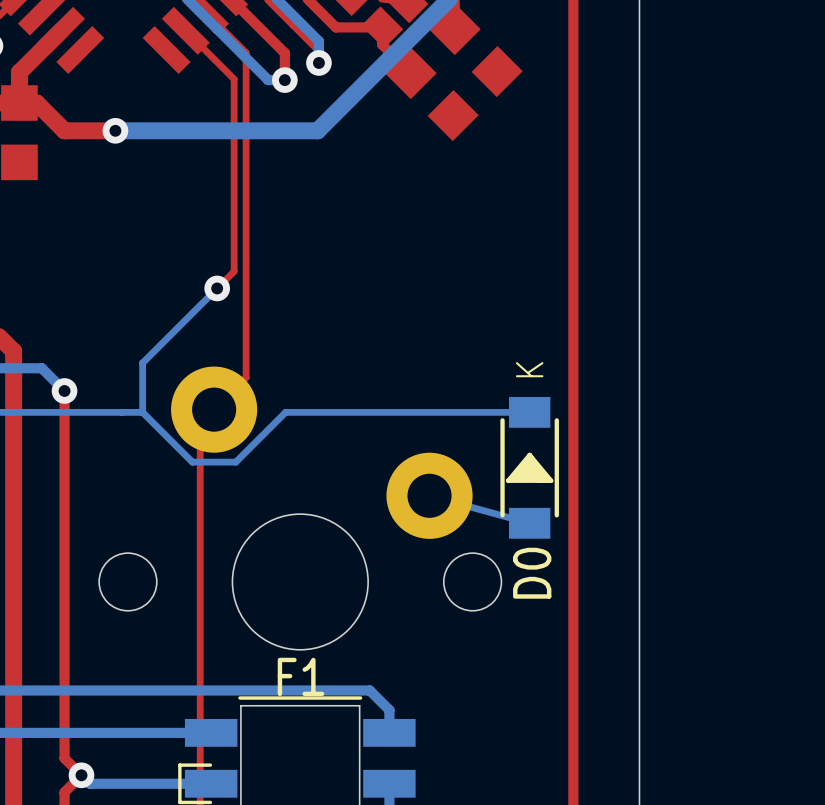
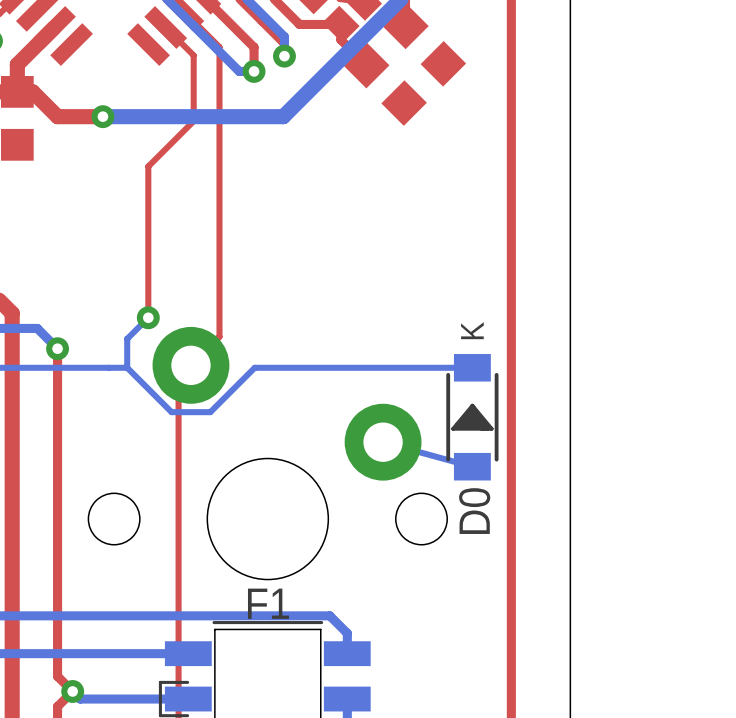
top track: (217, 62) (234, 79) (234, 271) (217, 288) -> (193, 55) (193, 121) (148, 166) (148, 317)
bottom track: (217, 288) (142, 363) (142, 379) -> (148, 317) (127, 338)
via position: (217, 288) -> (148, 317)

